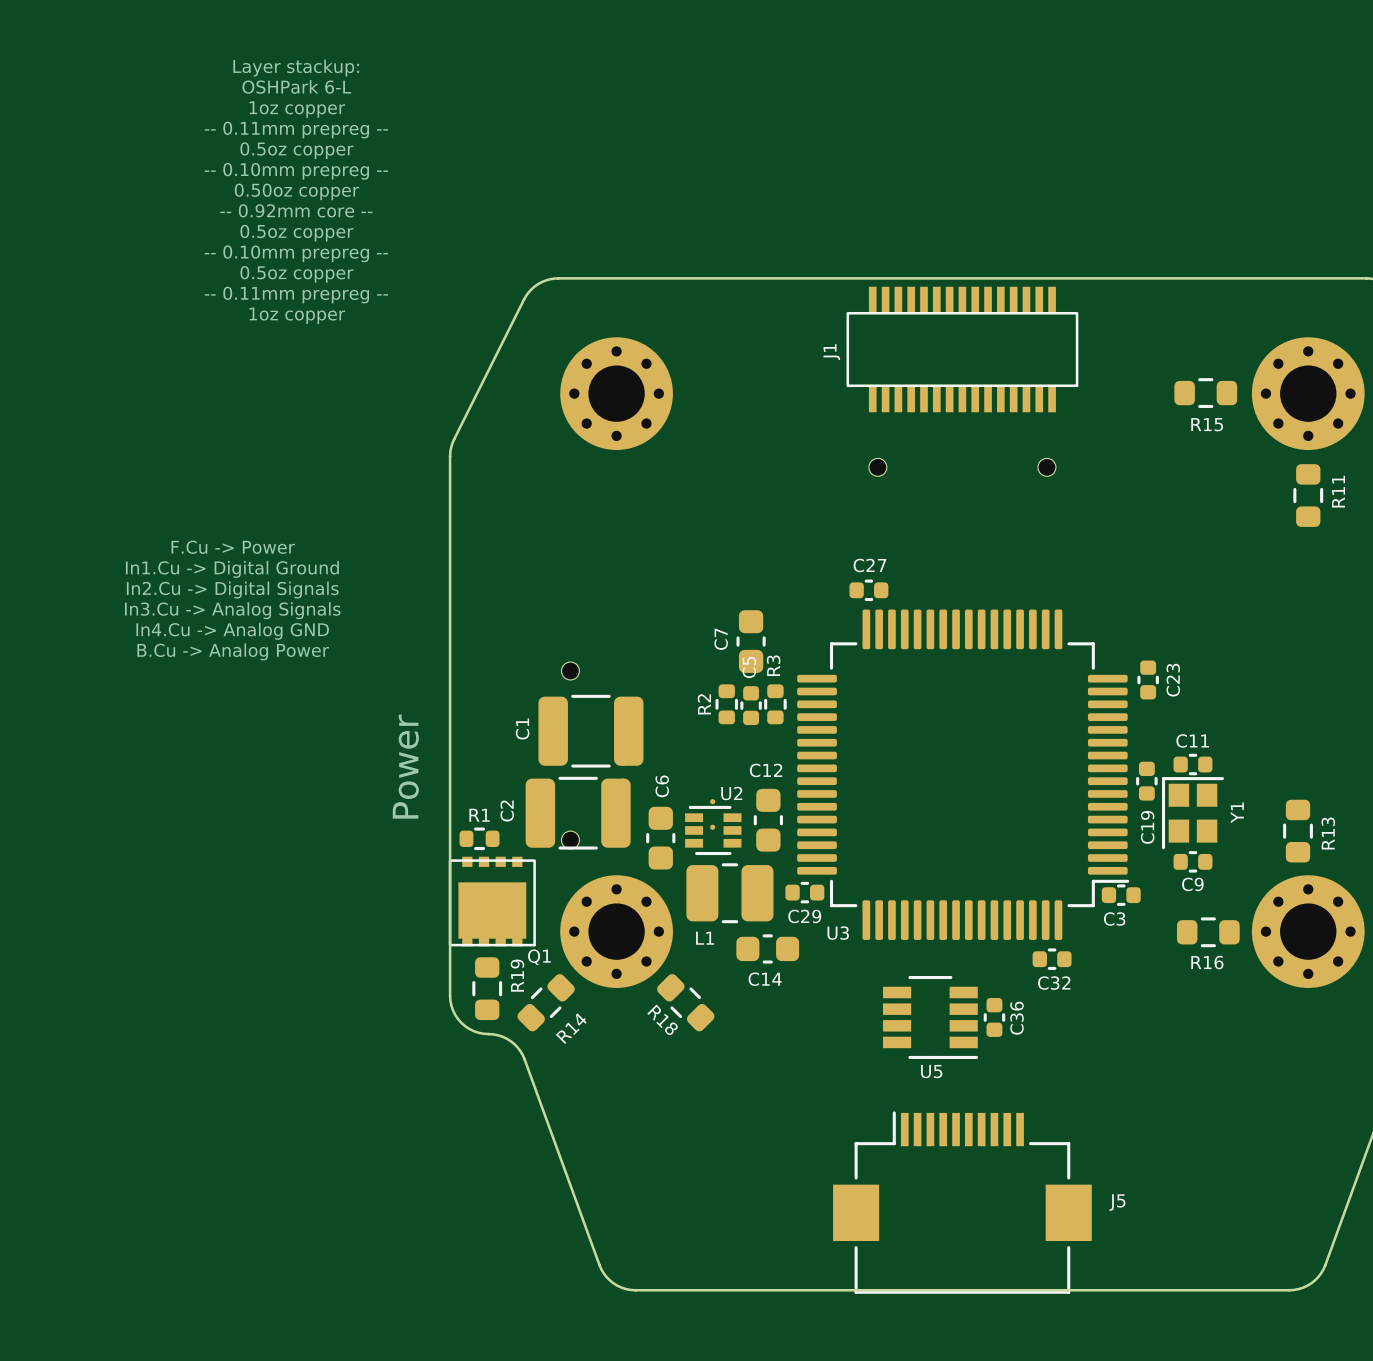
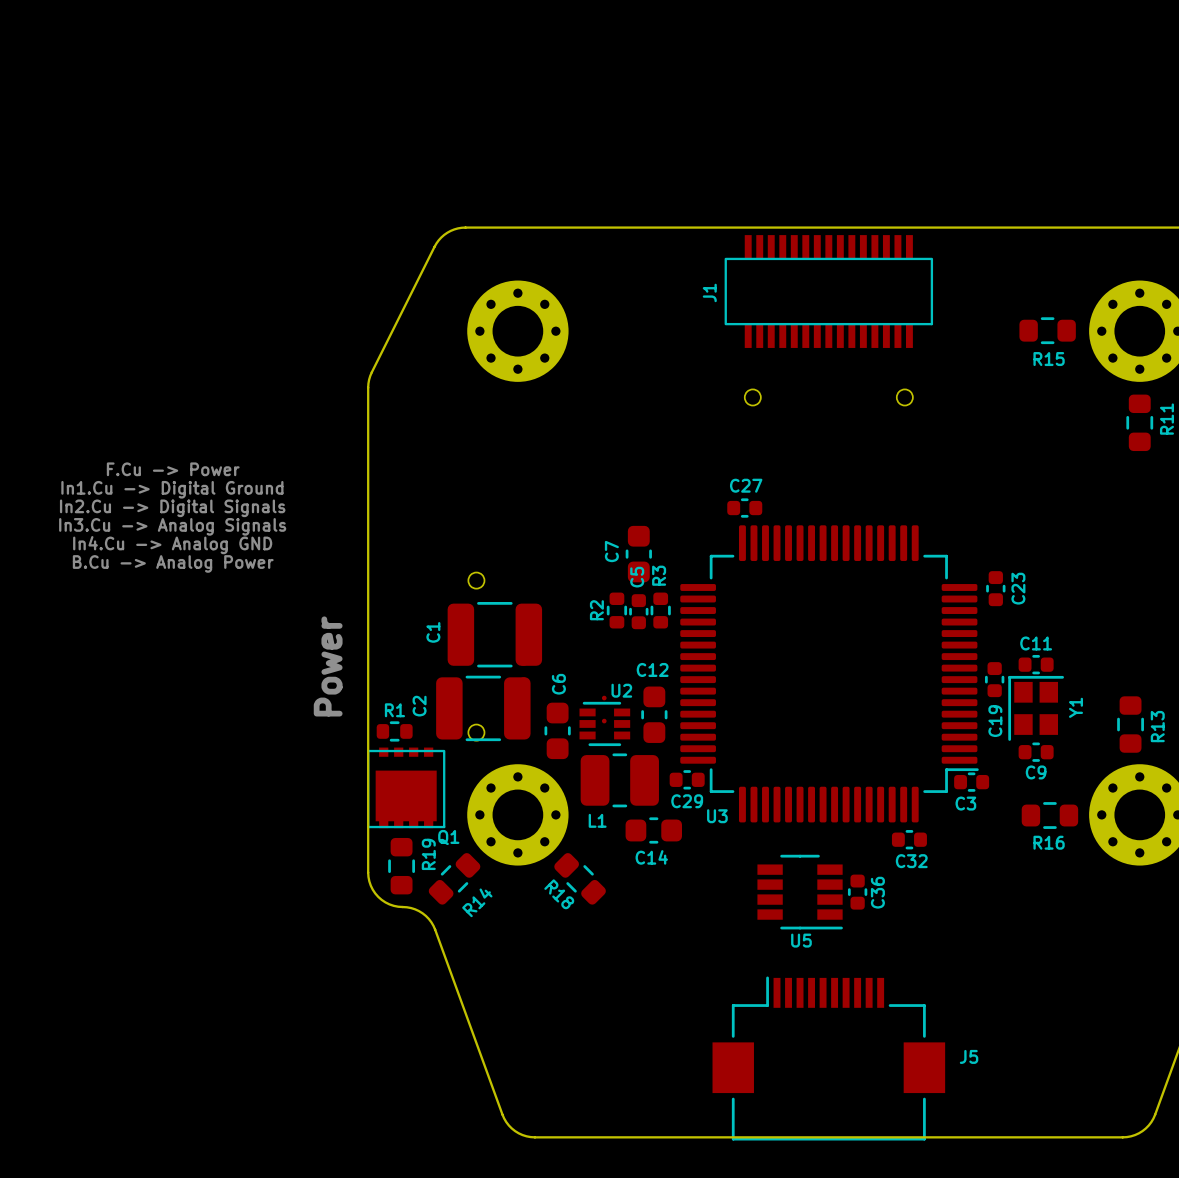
text: Layer stackup: (296, 68) -> none
text: OSHPark 6-L (296, 86) -> none
text: 1oz copper (297, 109) -> none
text: -- 0.11mm prepreg -- (296, 130) -> none
text: 0.5oz copper (296, 150) -> none
text: -- 0.10mm prepreg -- (296, 171) -> none
text: 0.50oz copper (296, 191) -> none
text: -- 0.92mm core -- (296, 210) -> none
text: 0.5oz copper (296, 233) -> none
text: -- 0.10mm prepreg -- (296, 253) -> none
text: 0.5oz copper (296, 274) -> none
text: -- 0.11mm prepreg -- (296, 295) -> none
text: 1oz copper (297, 315) -> none

